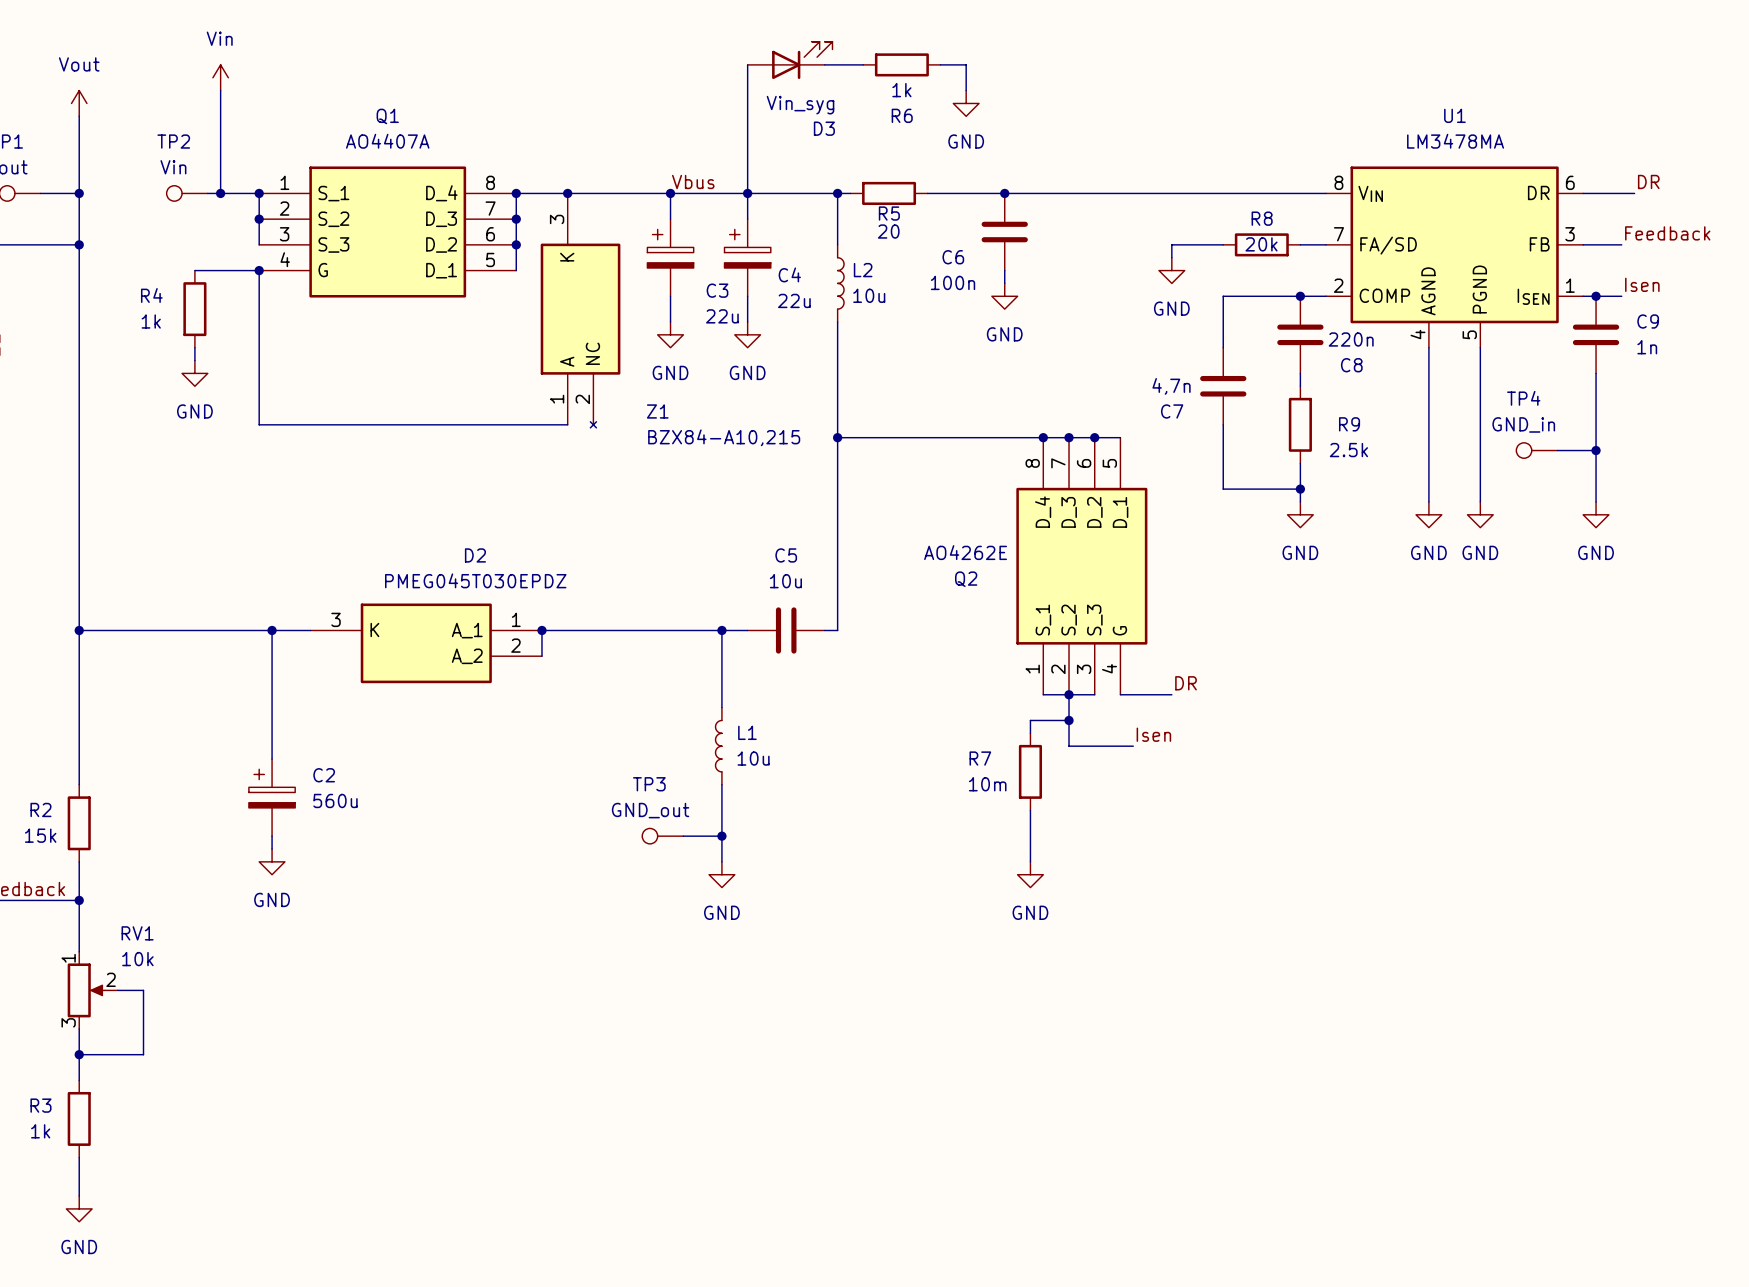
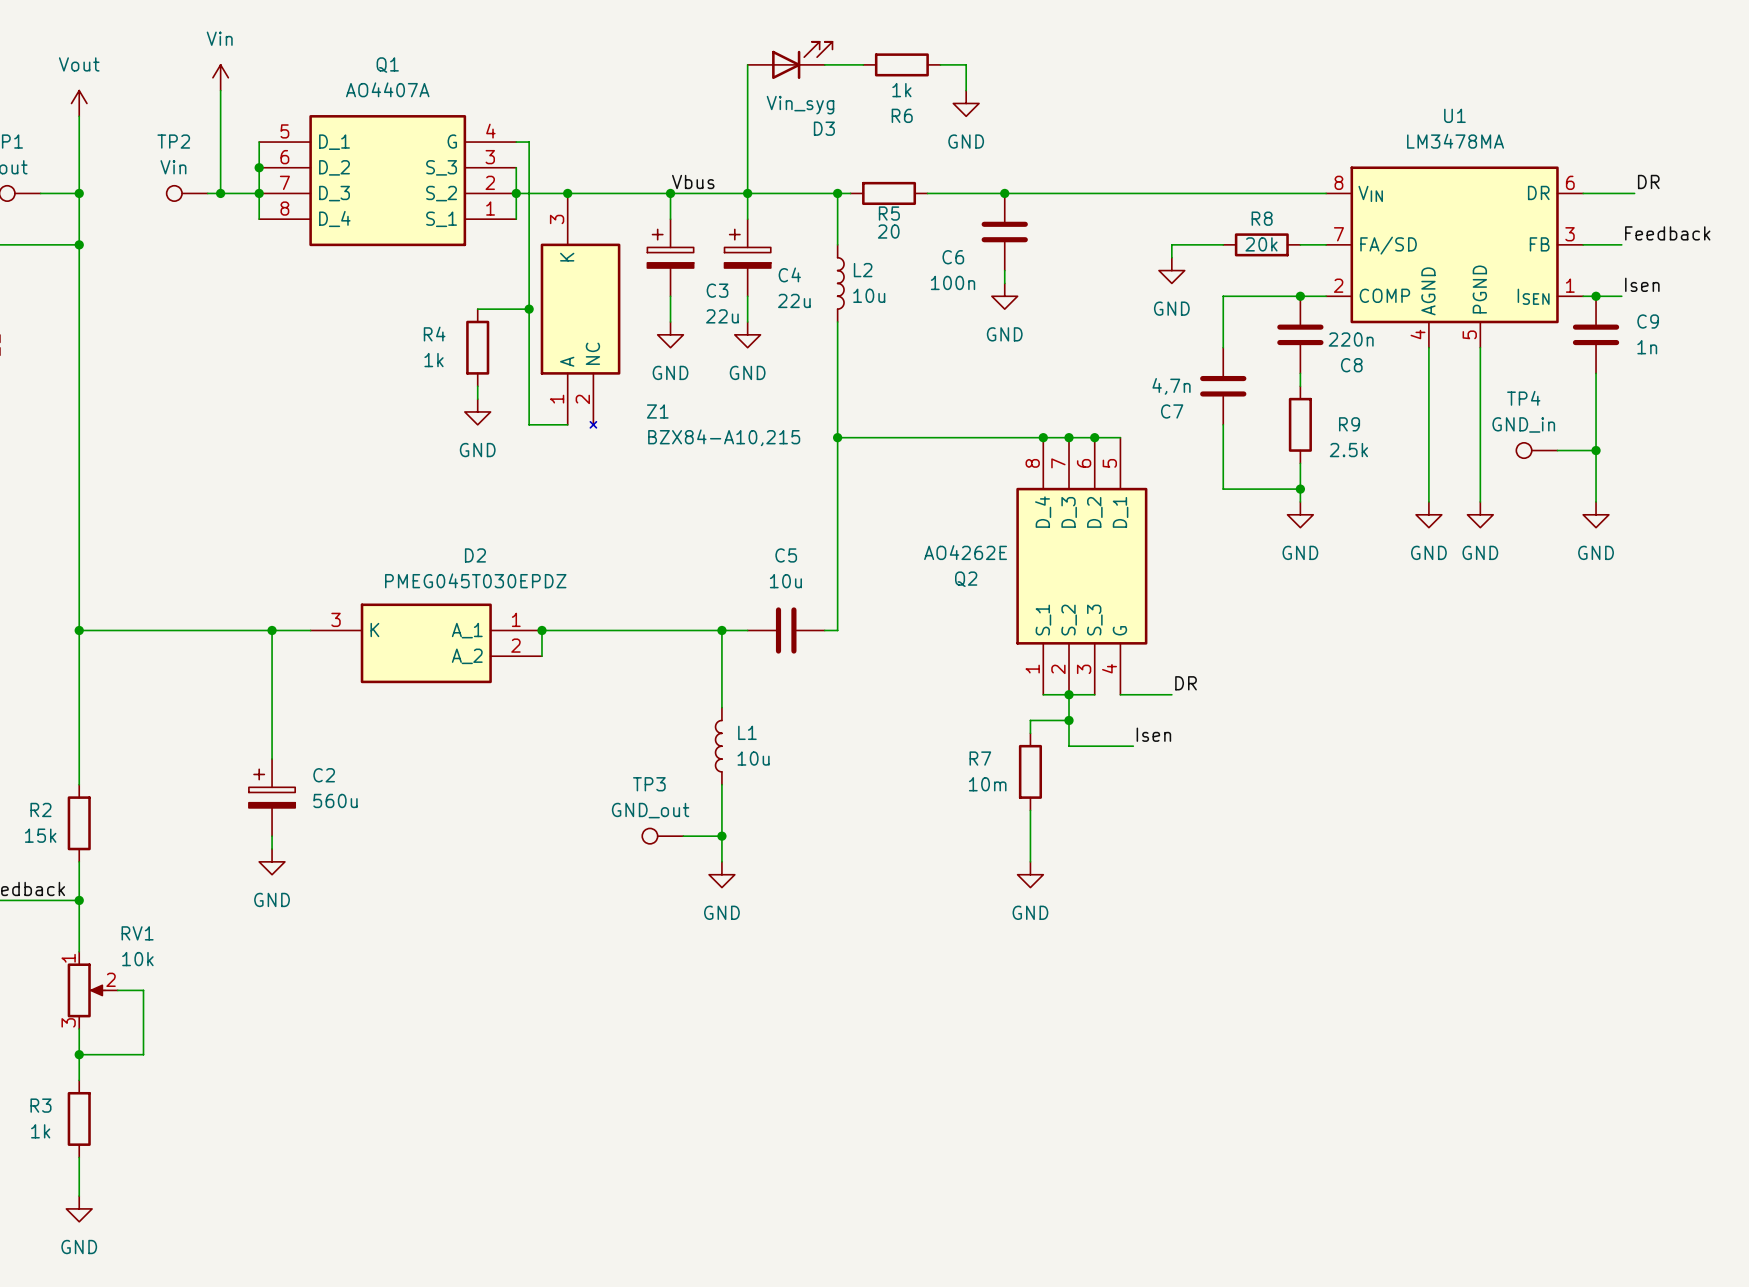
wire: none -> (259, 142) (259, 193)
junction: none -> (259, 167)
wire: none -> (516, 167) (516, 193)
wire: (259, 219) (259, 244) -> none
junction: (259, 219) -> none
wire: (516, 219) (516, 270) -> none
junction: (516, 219) -> none
Q1 rotation: 0° (387, 232) -> 180° (387, 180)
junction: (516, 244) -> none
wire: (194, 270) (259, 270) (259, 424) (529, 424) -> (516, 142) (529, 142) (529, 424)
junction: (259, 270) -> none
R4 position: (194, 309) -> (477, 347)
wire: none -> (477, 309) (529, 309)
junction: none -> (529, 309)
wire: (194, 347) (194, 360) -> none
power symbol: GND (194, 373) -> none
wire: none -> (477, 386) (477, 399)
power symbol: none -> GND (477, 411)

